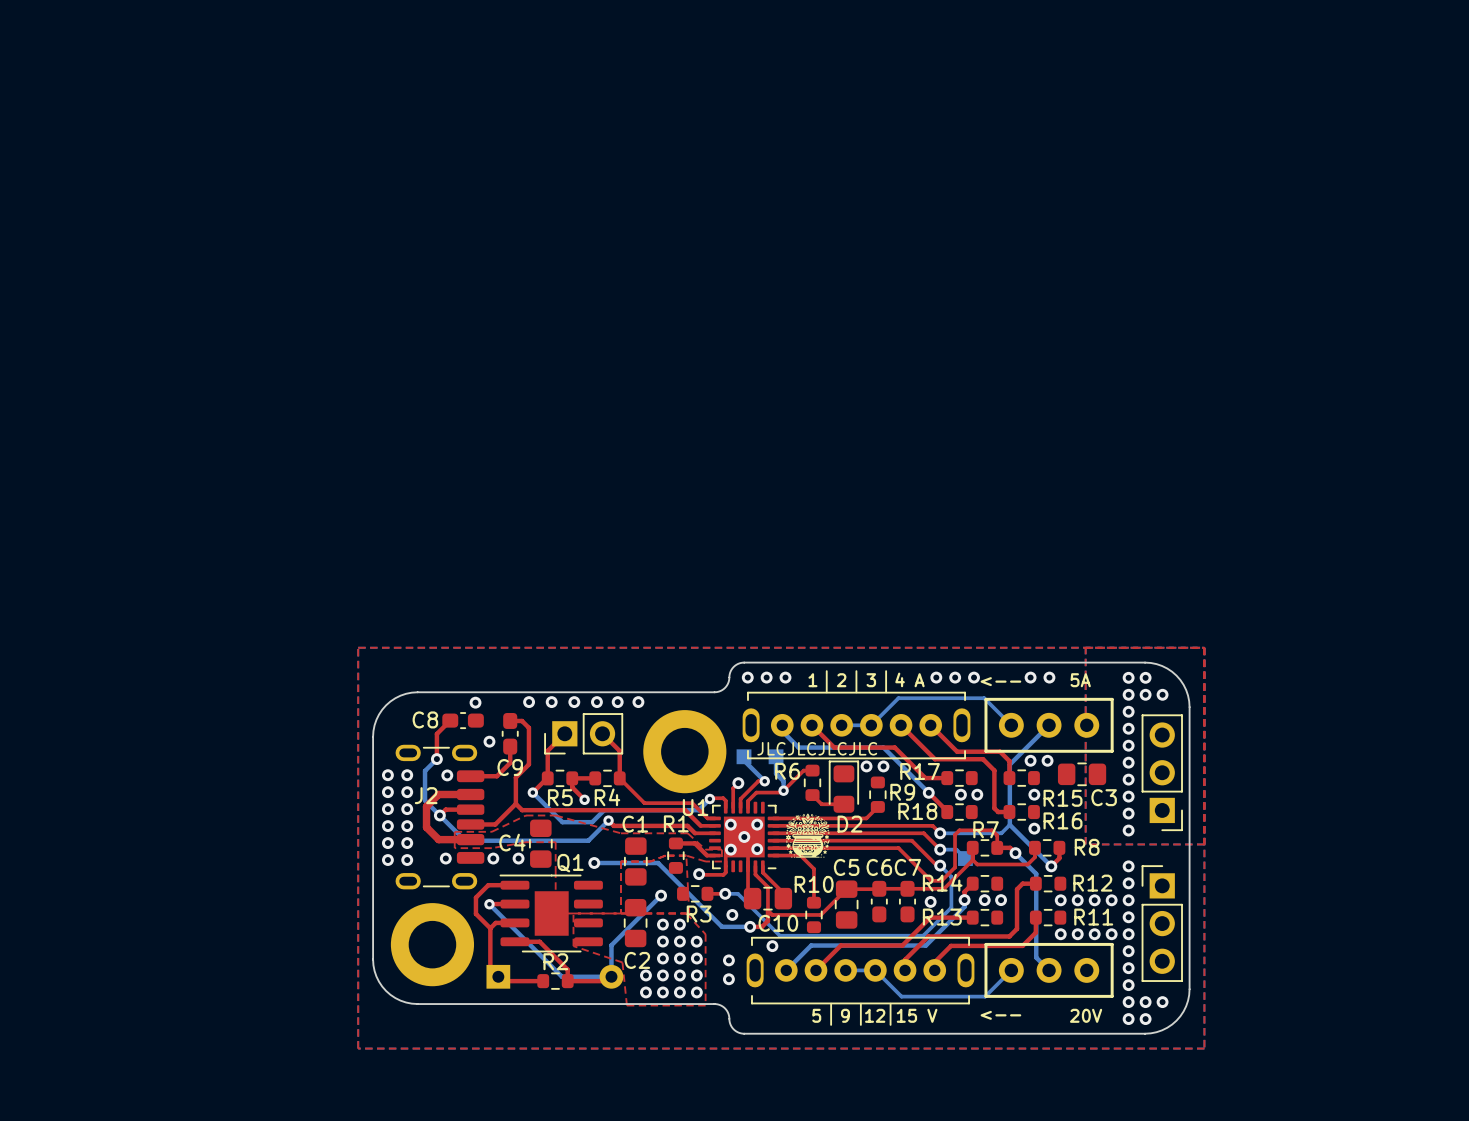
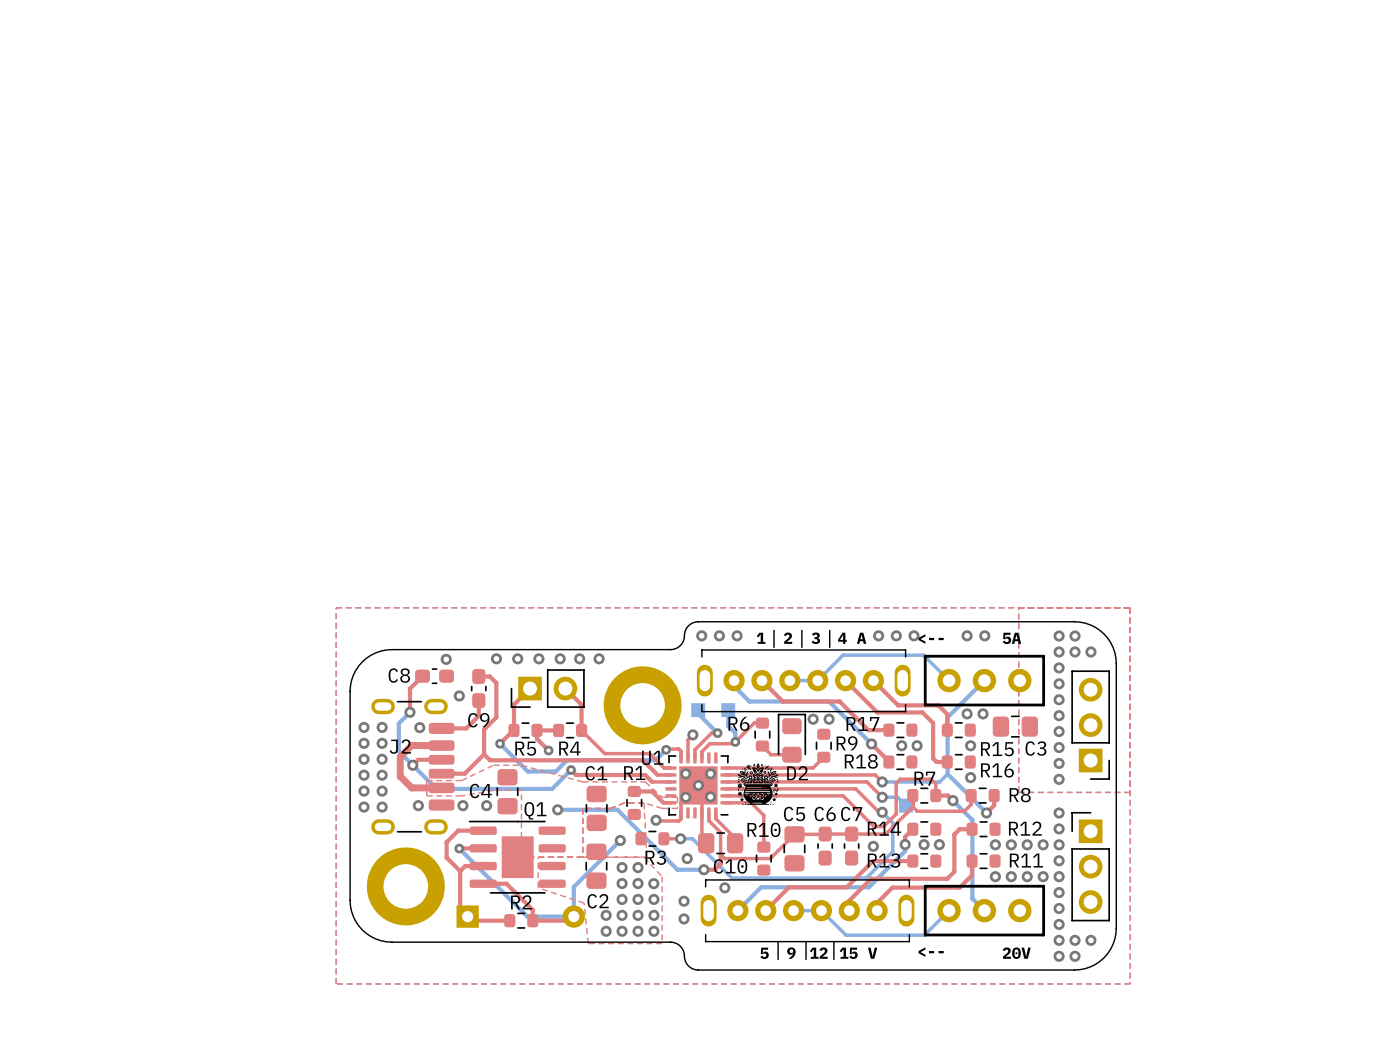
text: JLCJLCJLCJLC (817, 748) -> none

